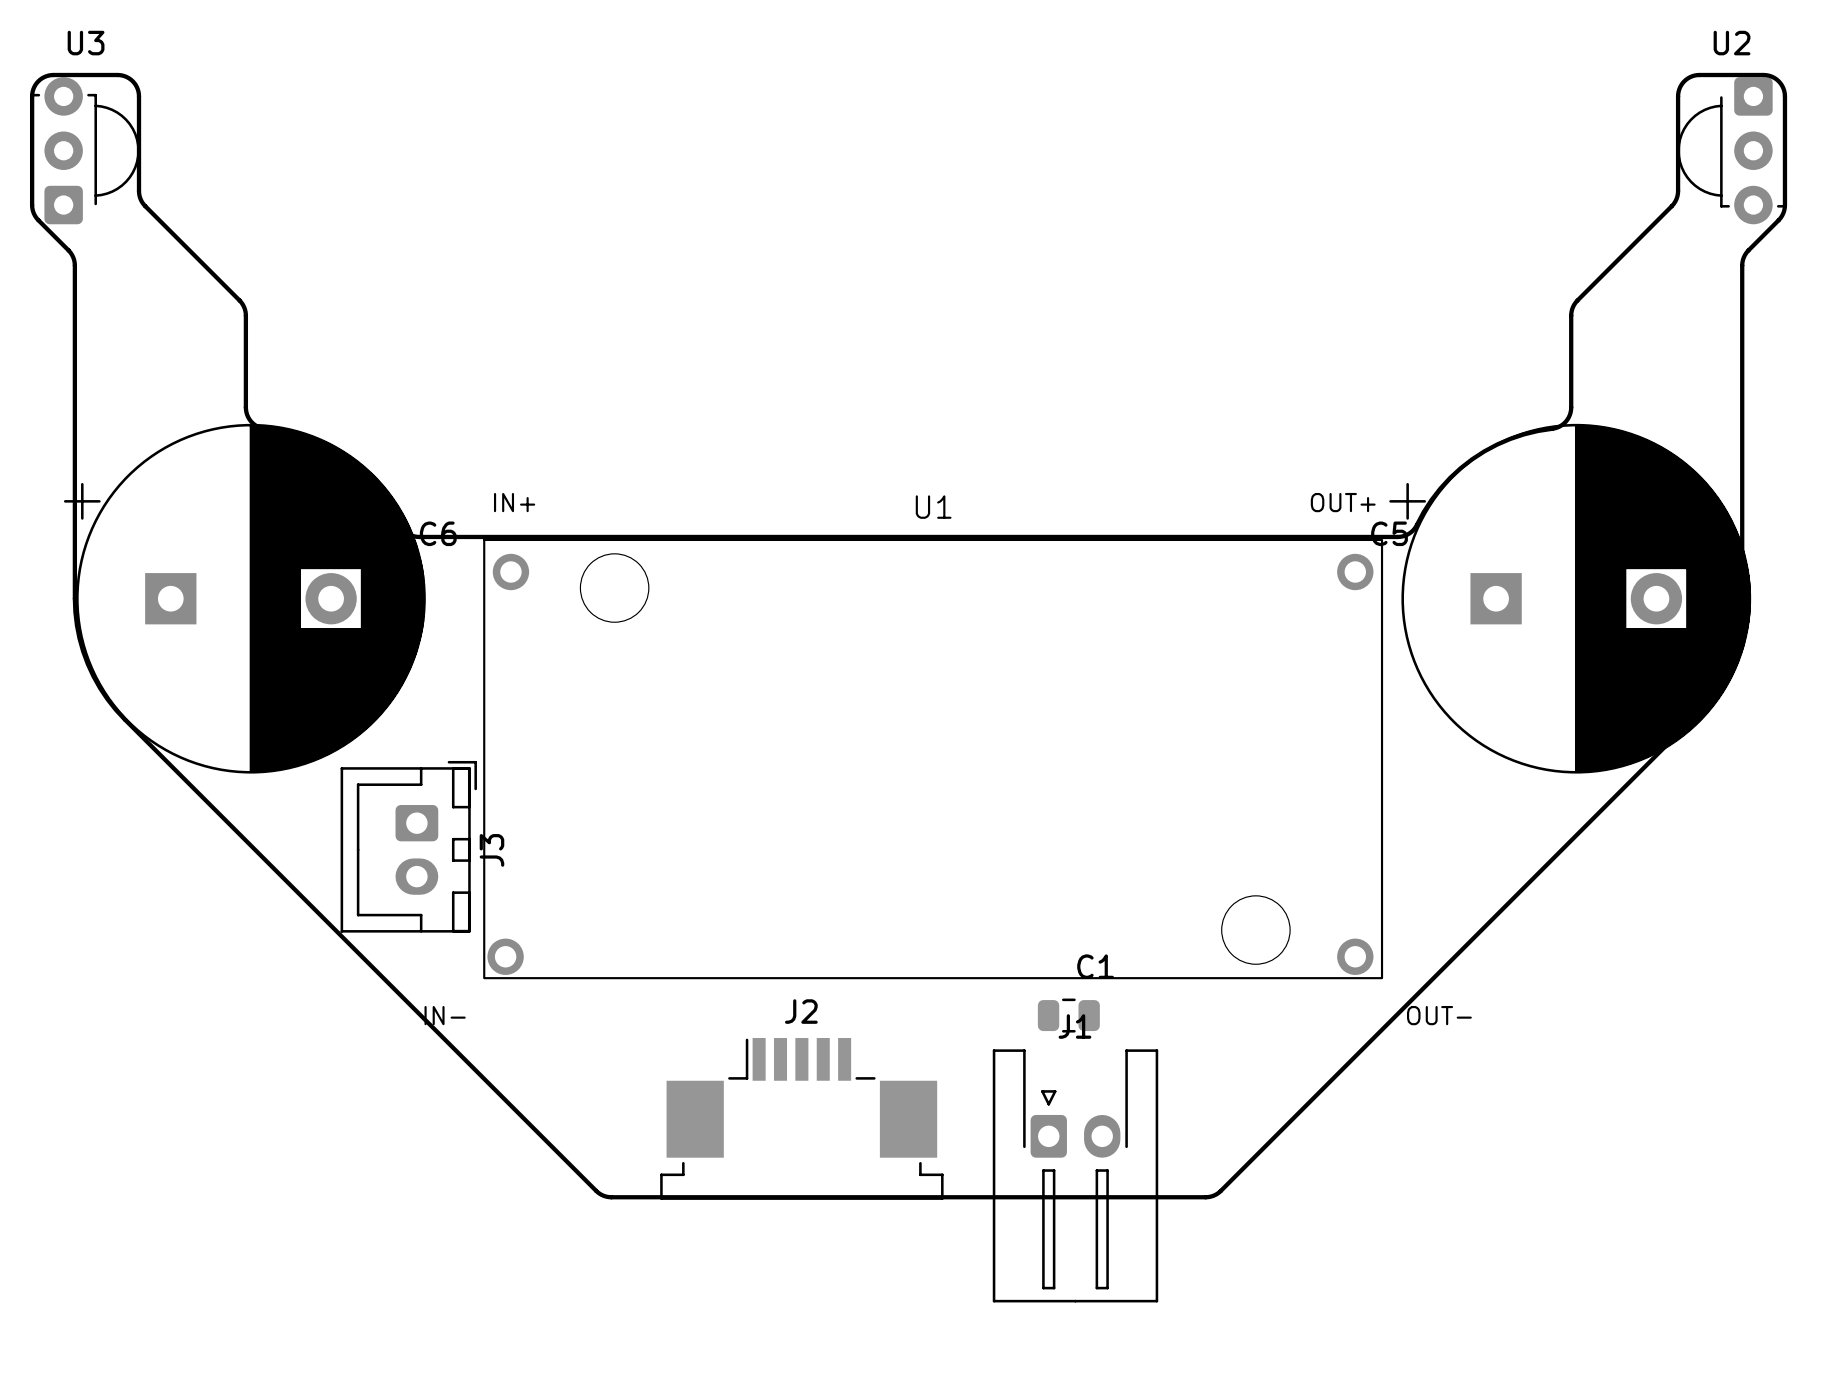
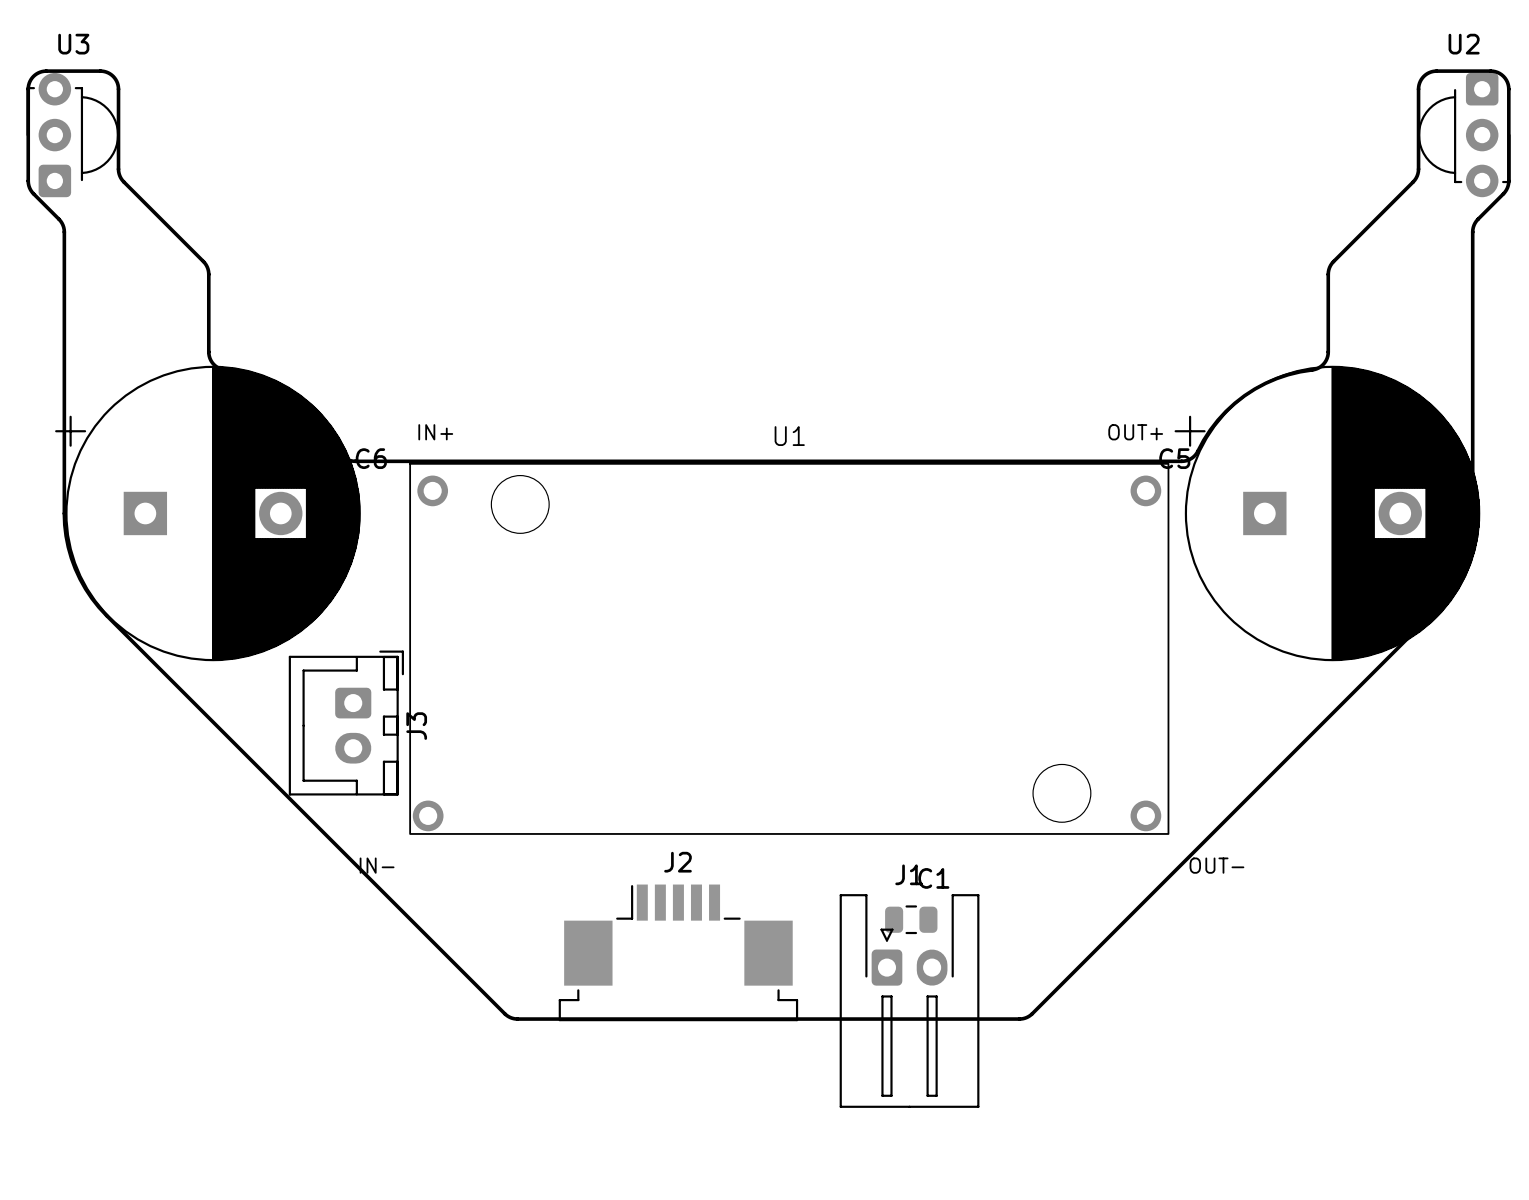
C1 position: (1068, 1015) -> (911, 919)

